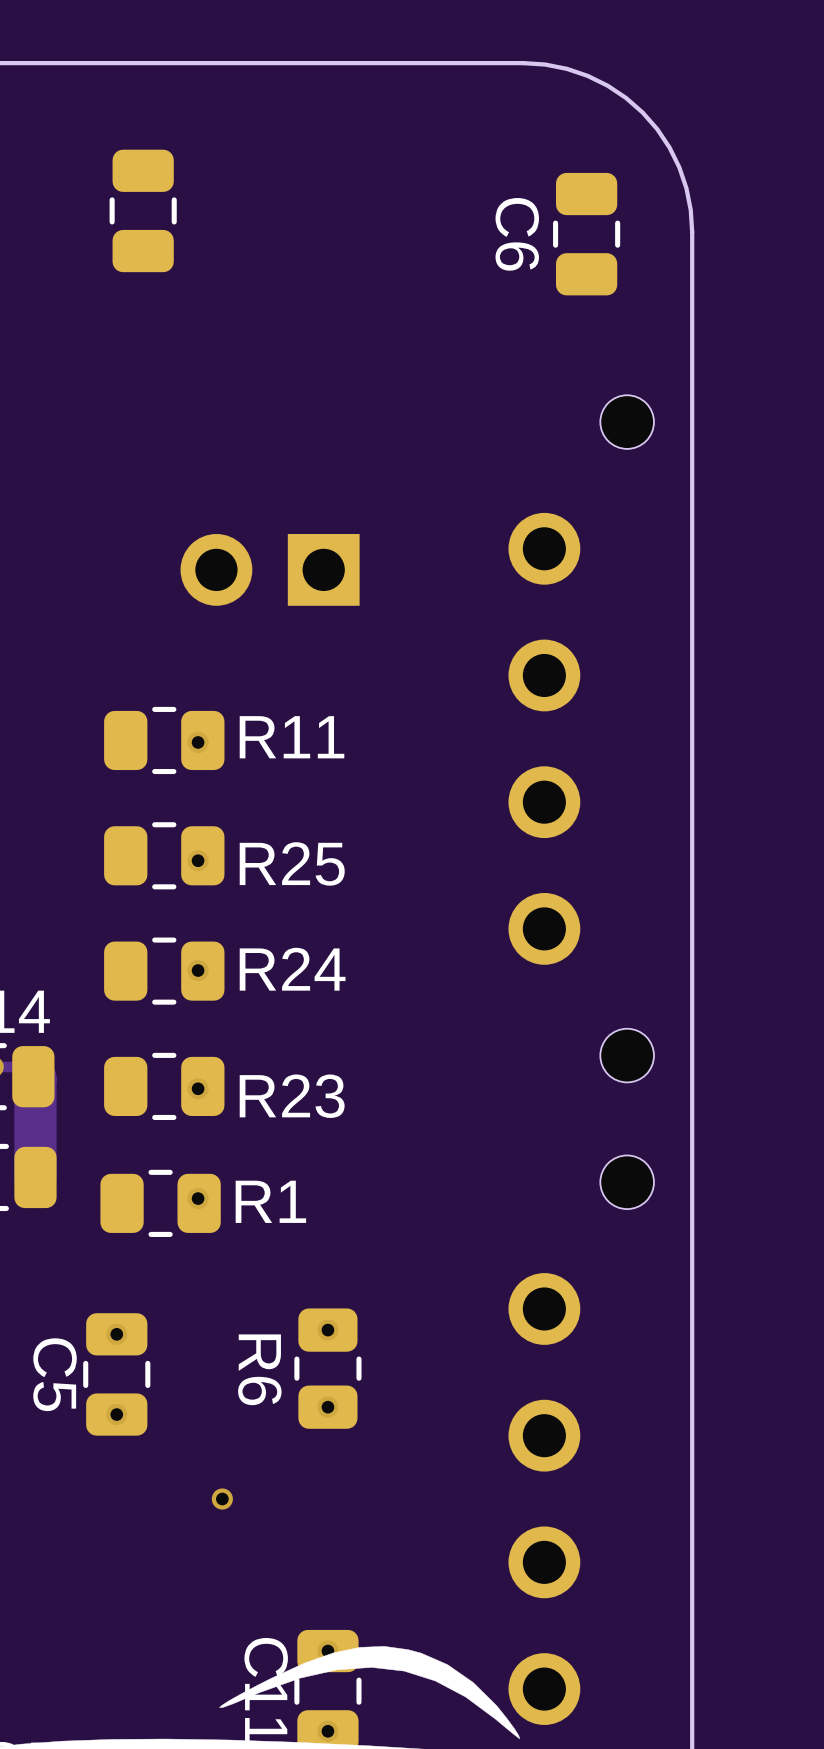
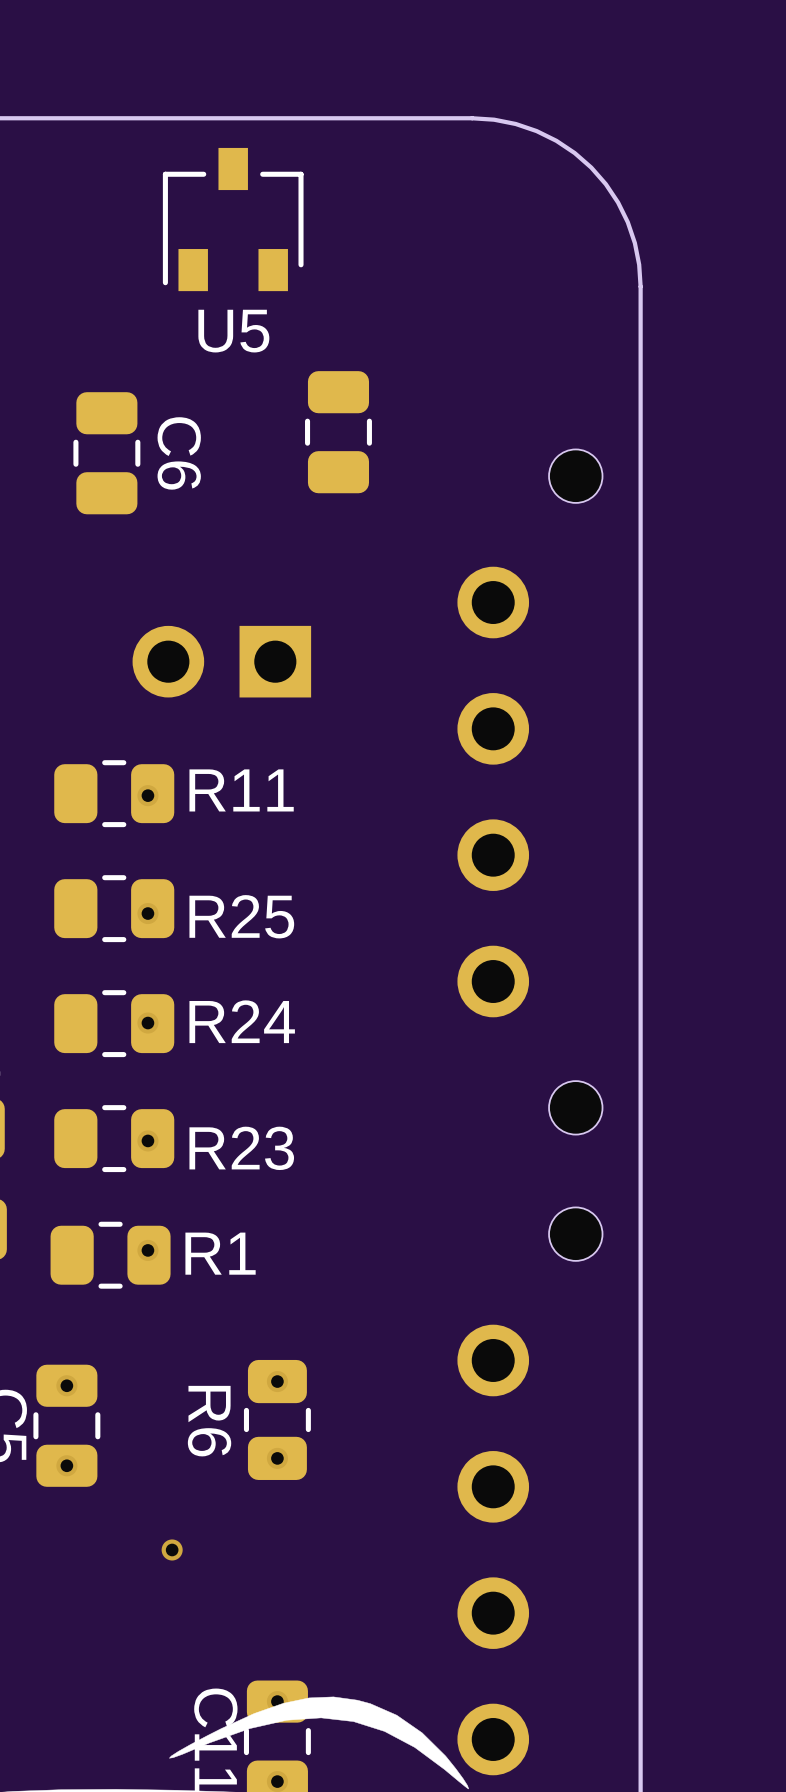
U5: none -> (233, 219)
part position: (143, 210) -> (338, 432)
C6 name position: C6 (517, 234) -> C6 (179, 453)
C6 position: (586, 234) -> (106, 453)
part position: (270, 569) -> (221, 661)

